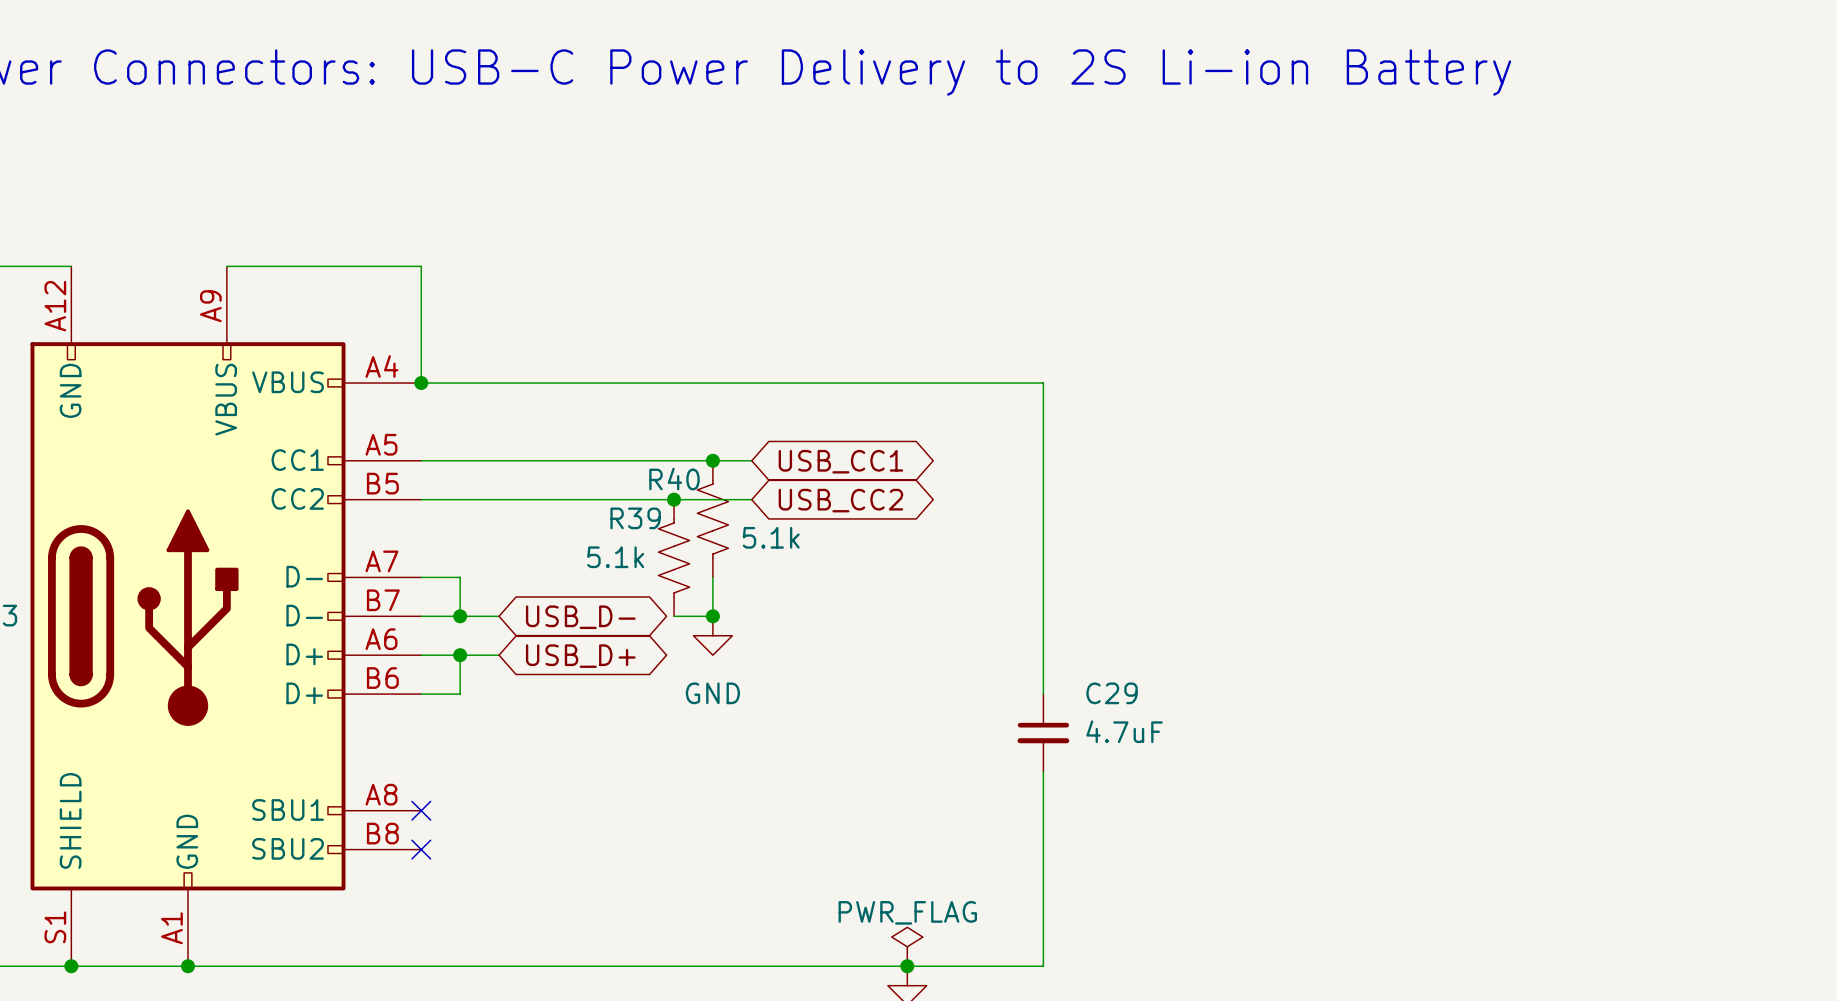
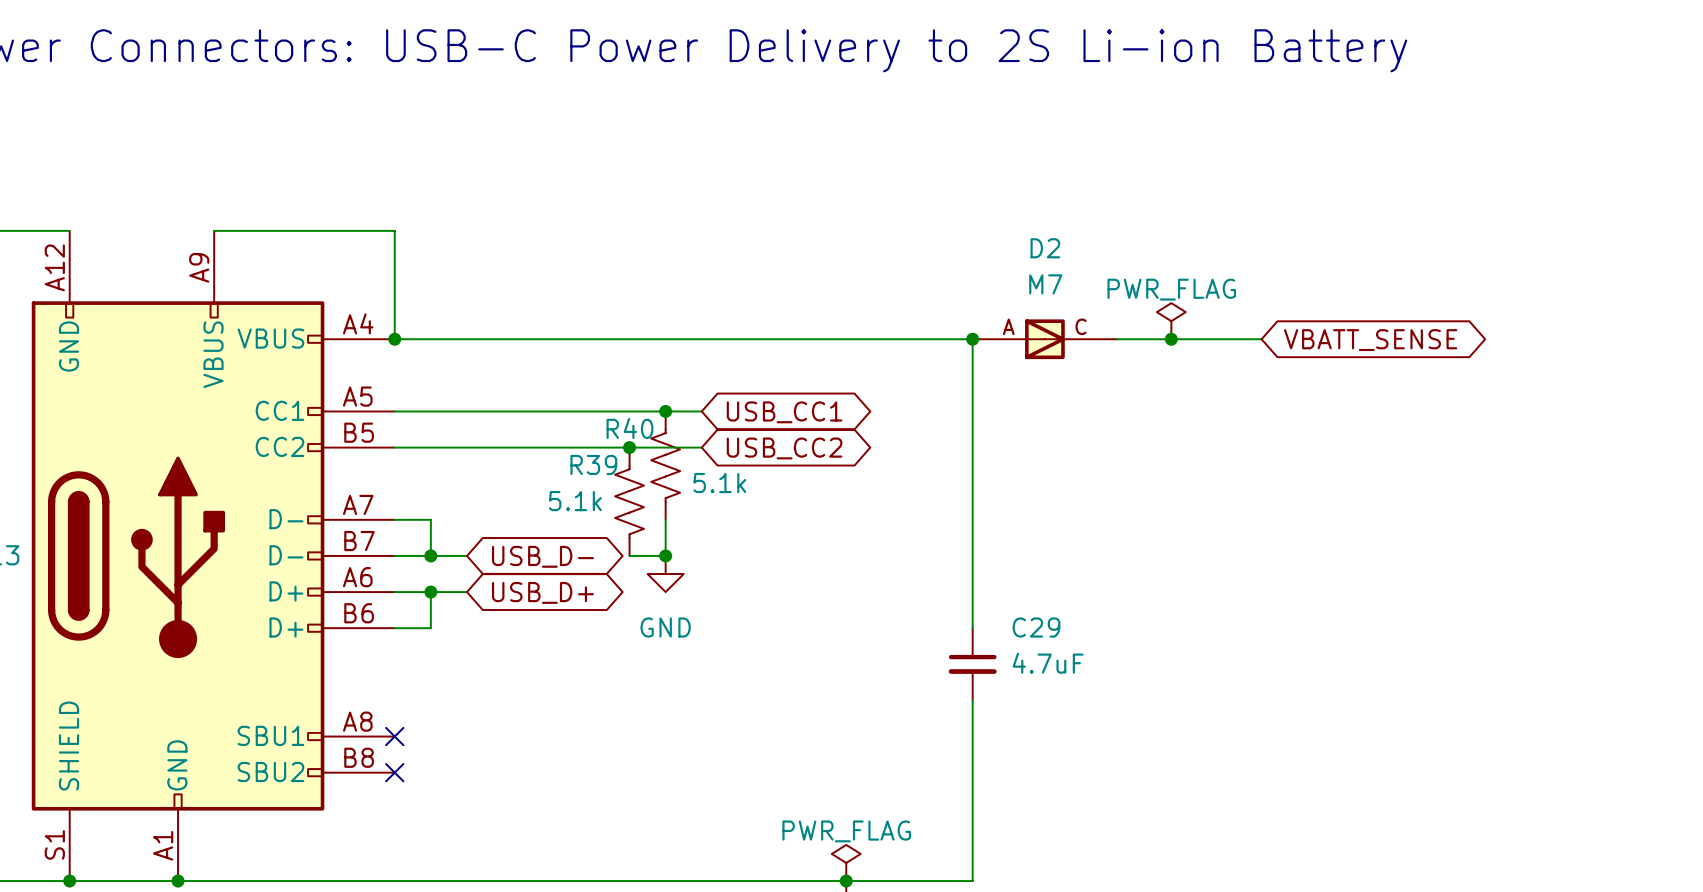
power symbol: none -> PWR_FLAG (1171, 321)
junction: none -> (972, 339)
D2: none -> M7 (1044, 339)
wire: none -> (1117, 339) (1261, 339)
junction: none -> (1171, 339)
global label: none -> VBATT_SENSE (1370, 340)

